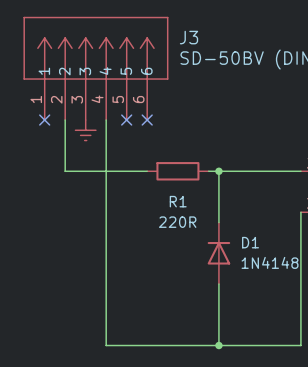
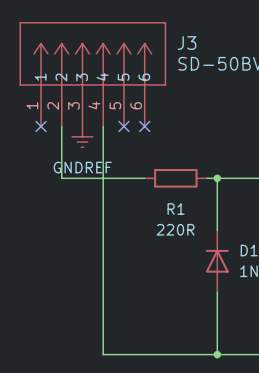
power symbol text: none -> GNDREF (82, 167)

